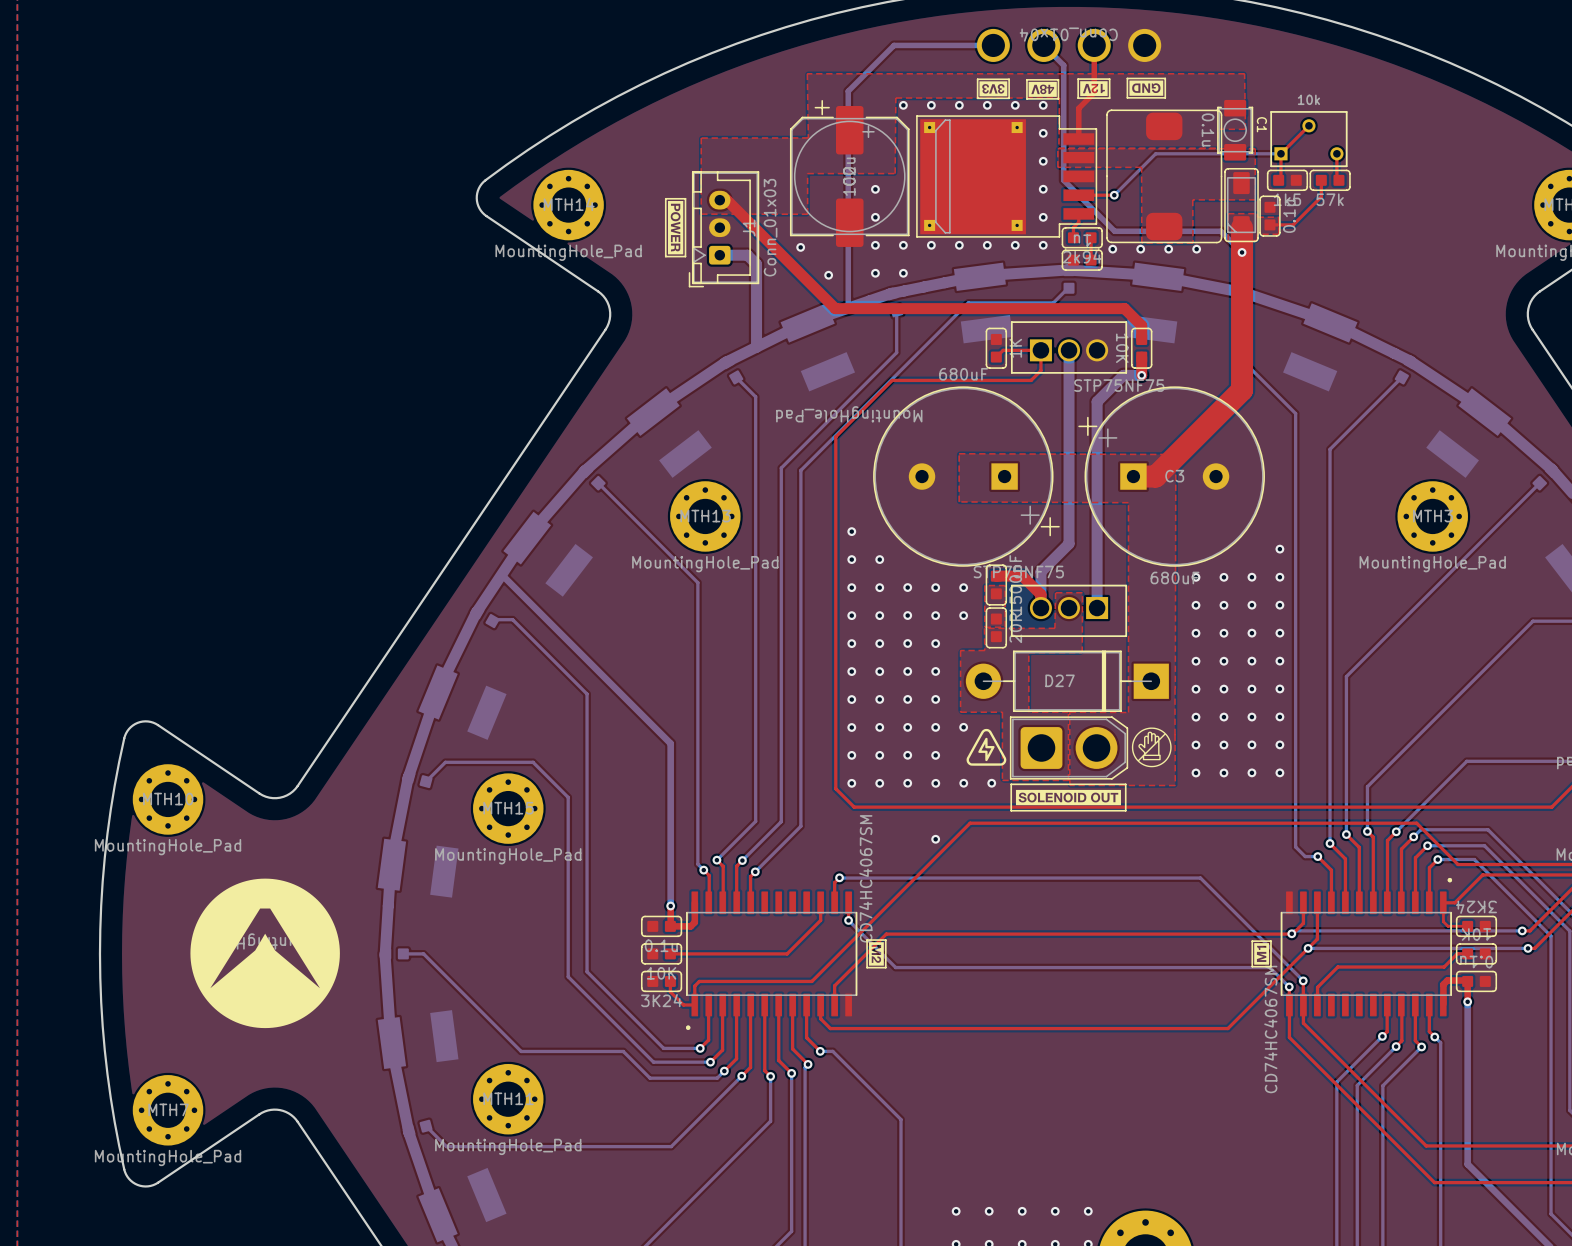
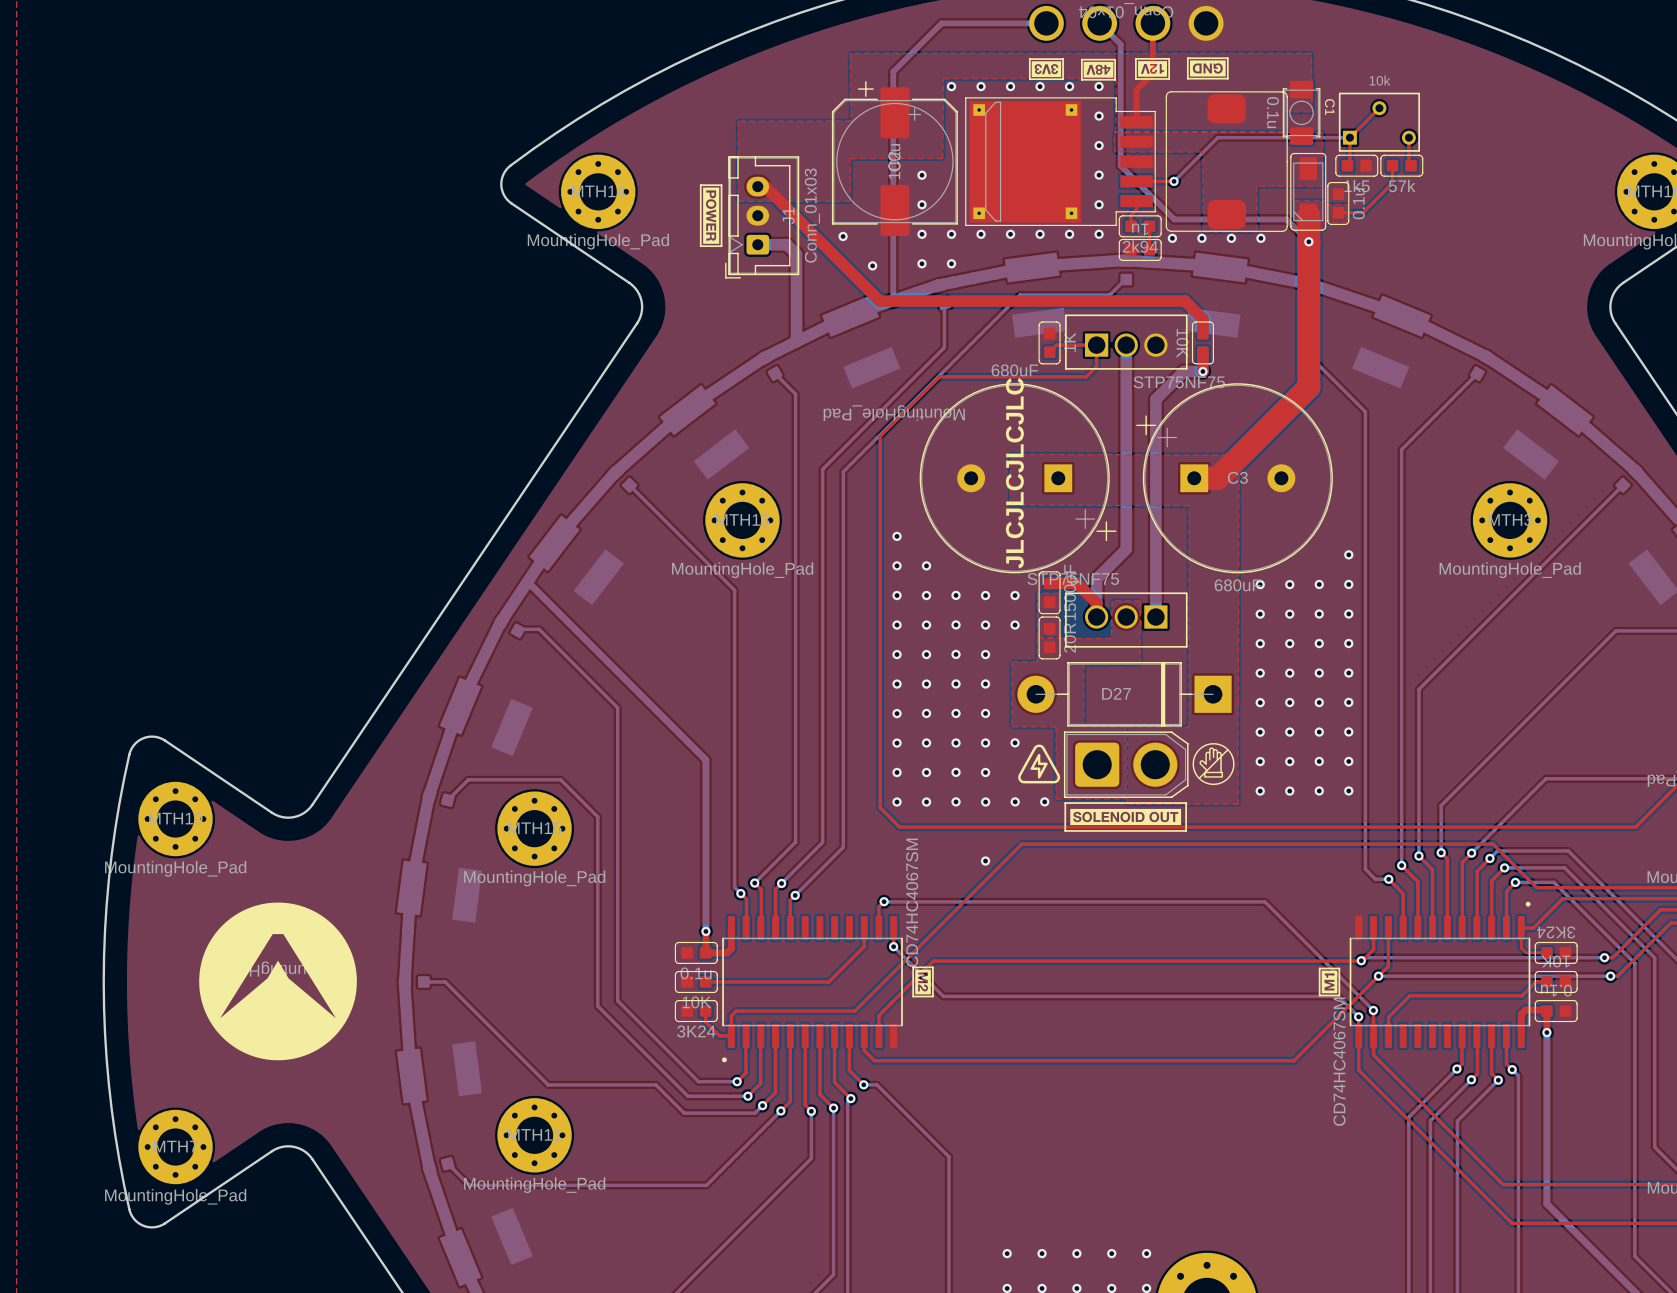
text: none -> JLCJLCJLCJLC (1014, 473)

